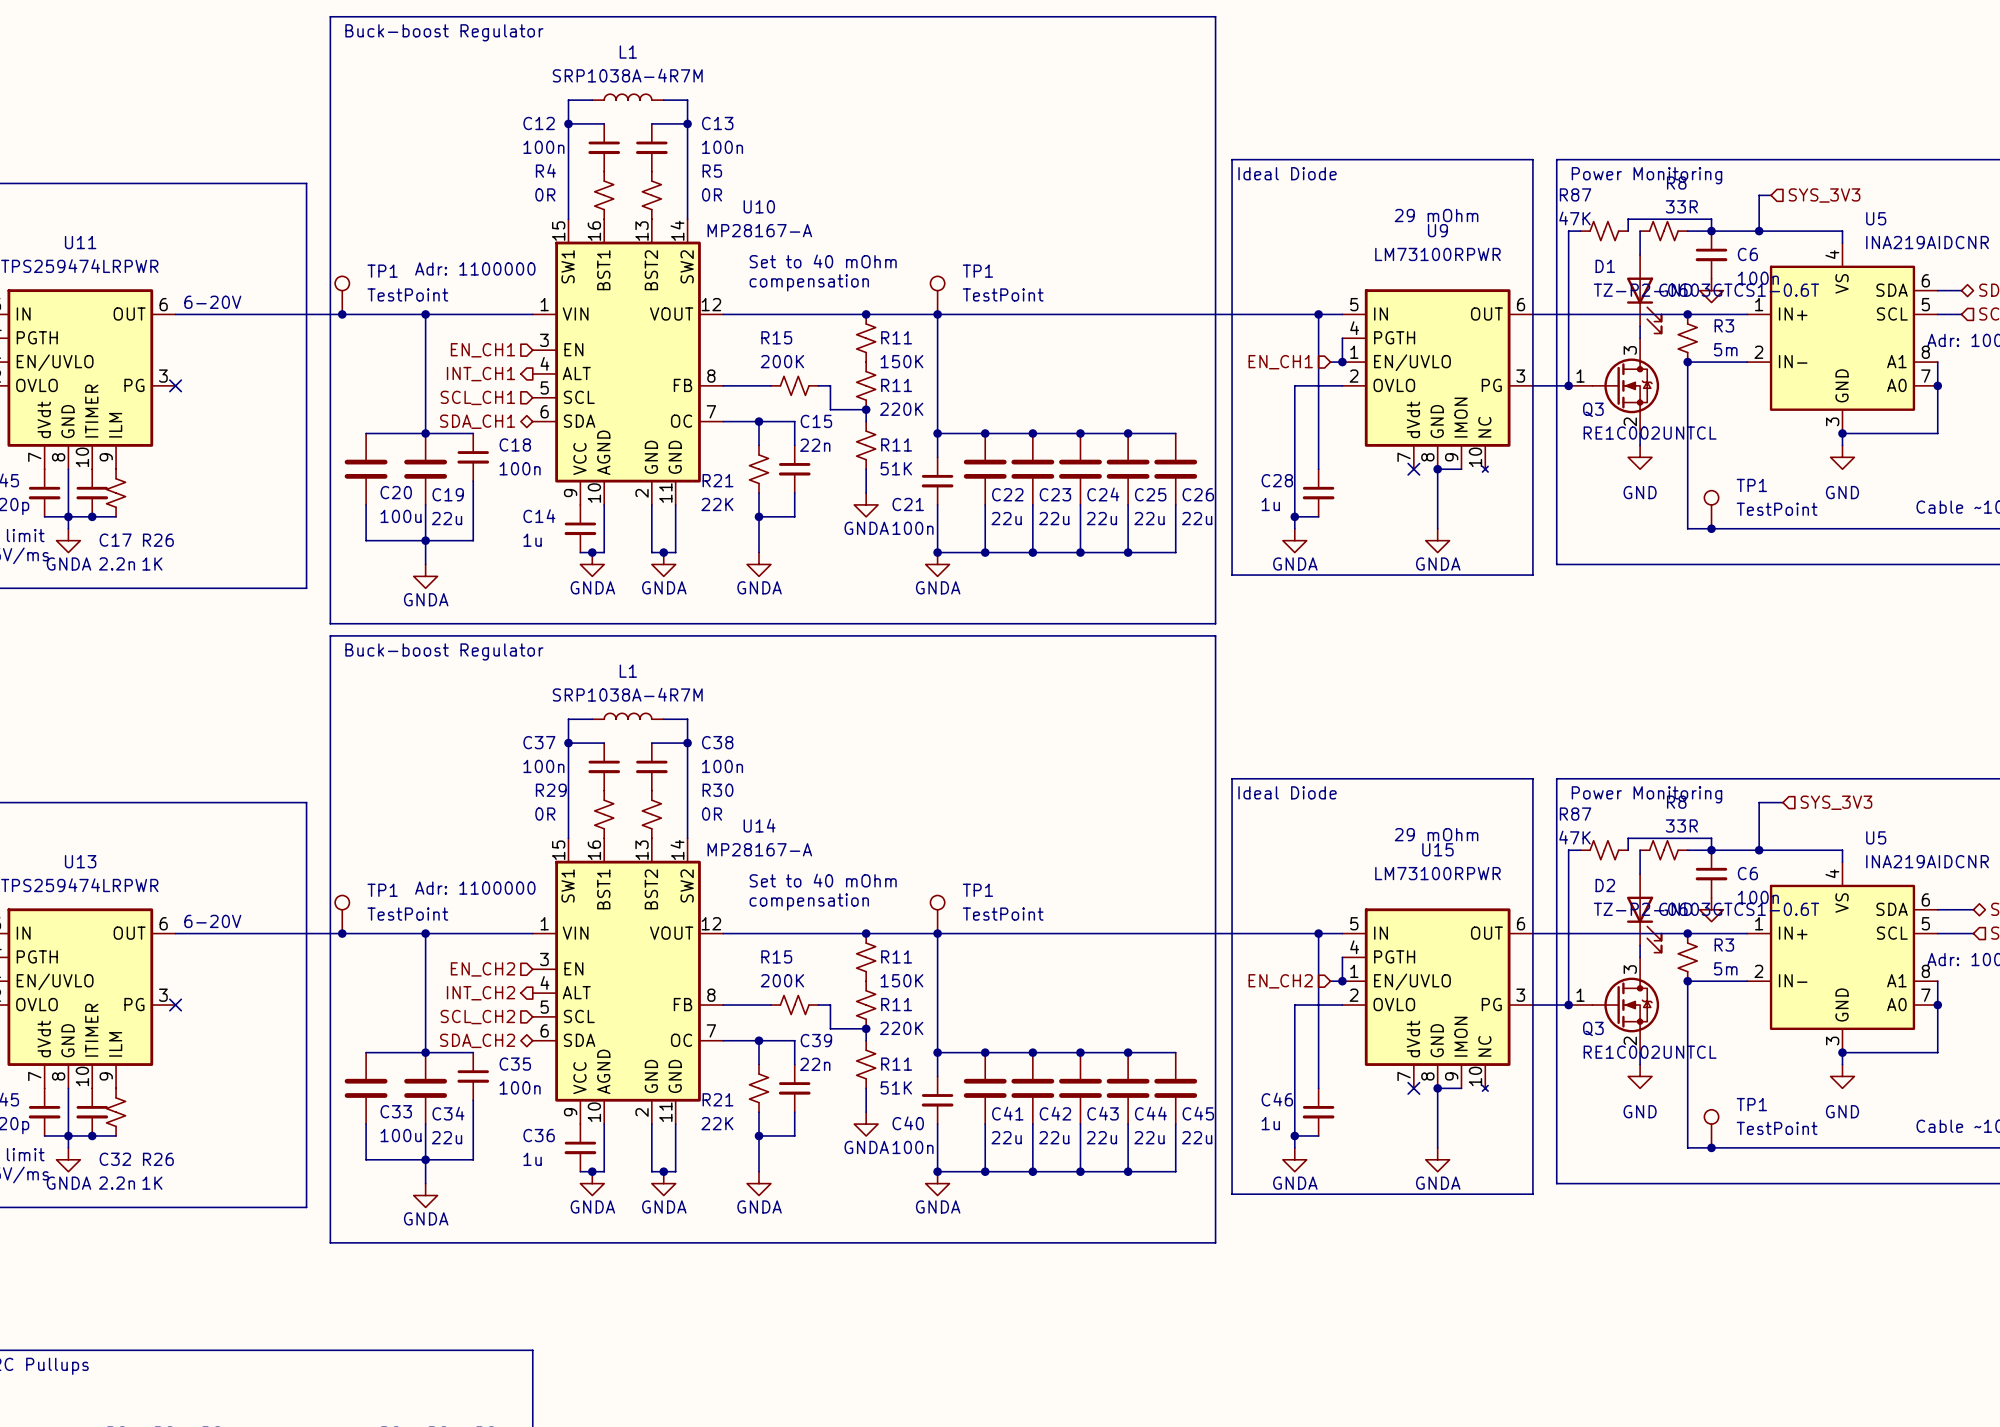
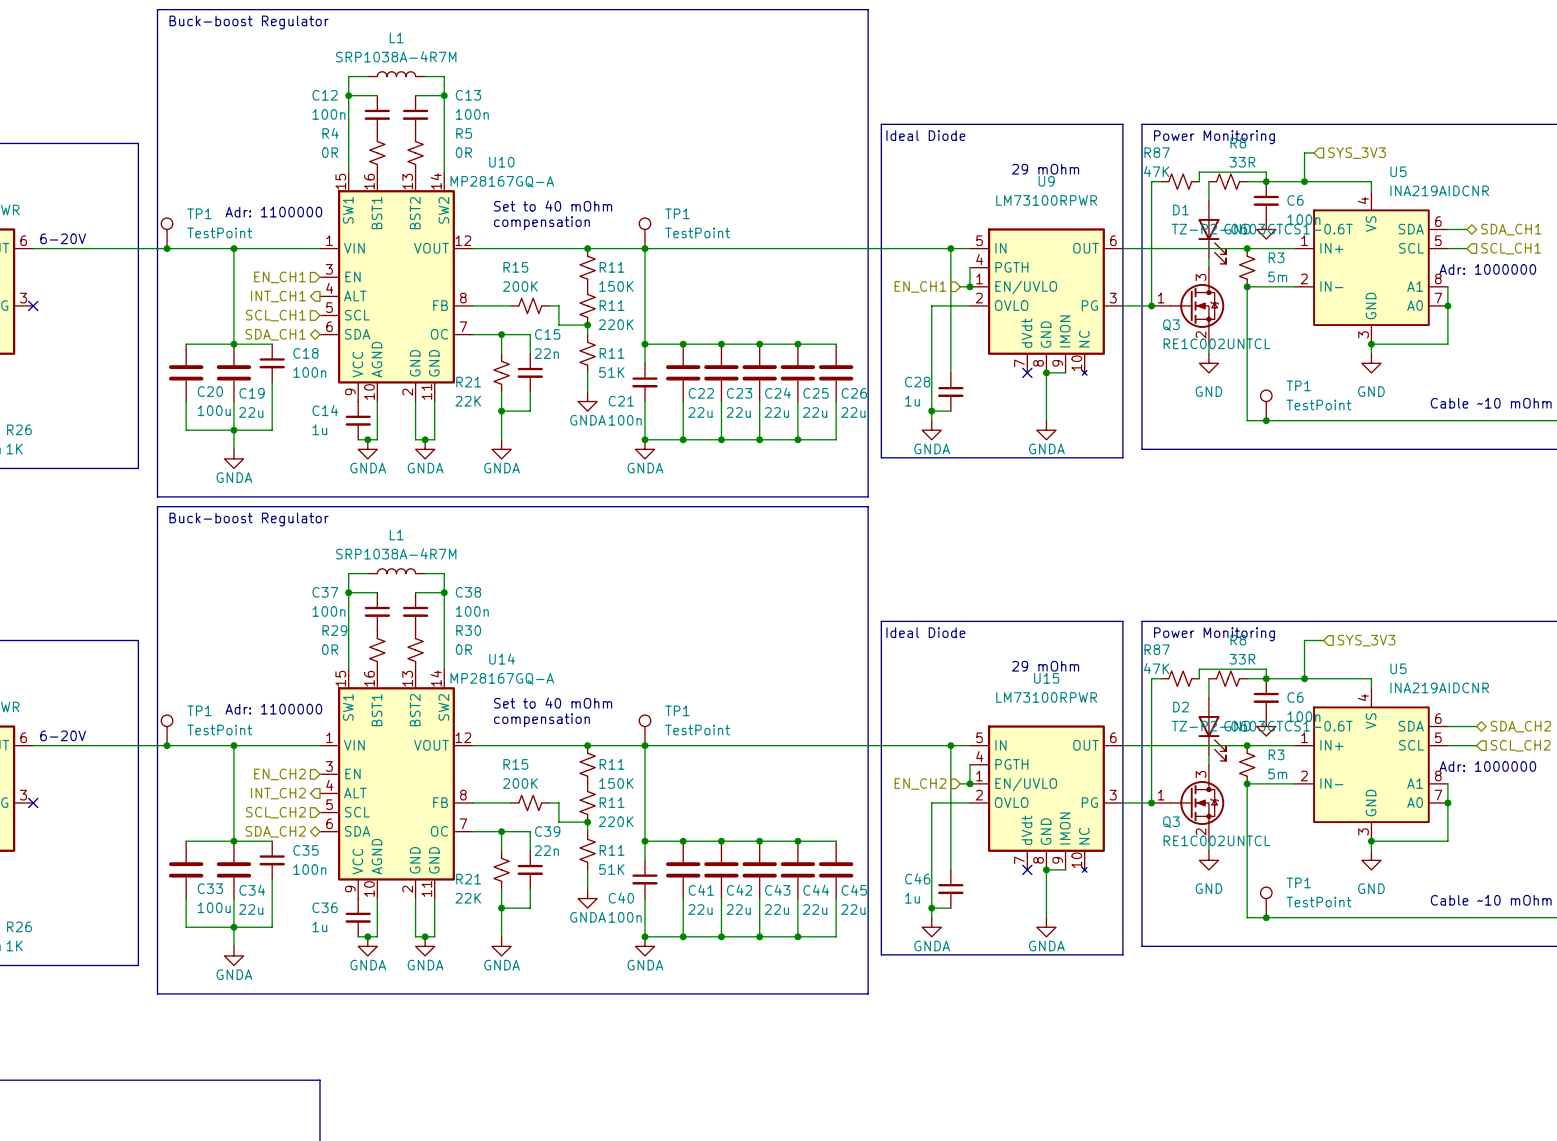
U10 value: MP28167-A (759, 230) -> MP28167GQ-A (502, 181)
U14 value: MP28167-A (759, 849) -> MP28167GQ-A (502, 678)

